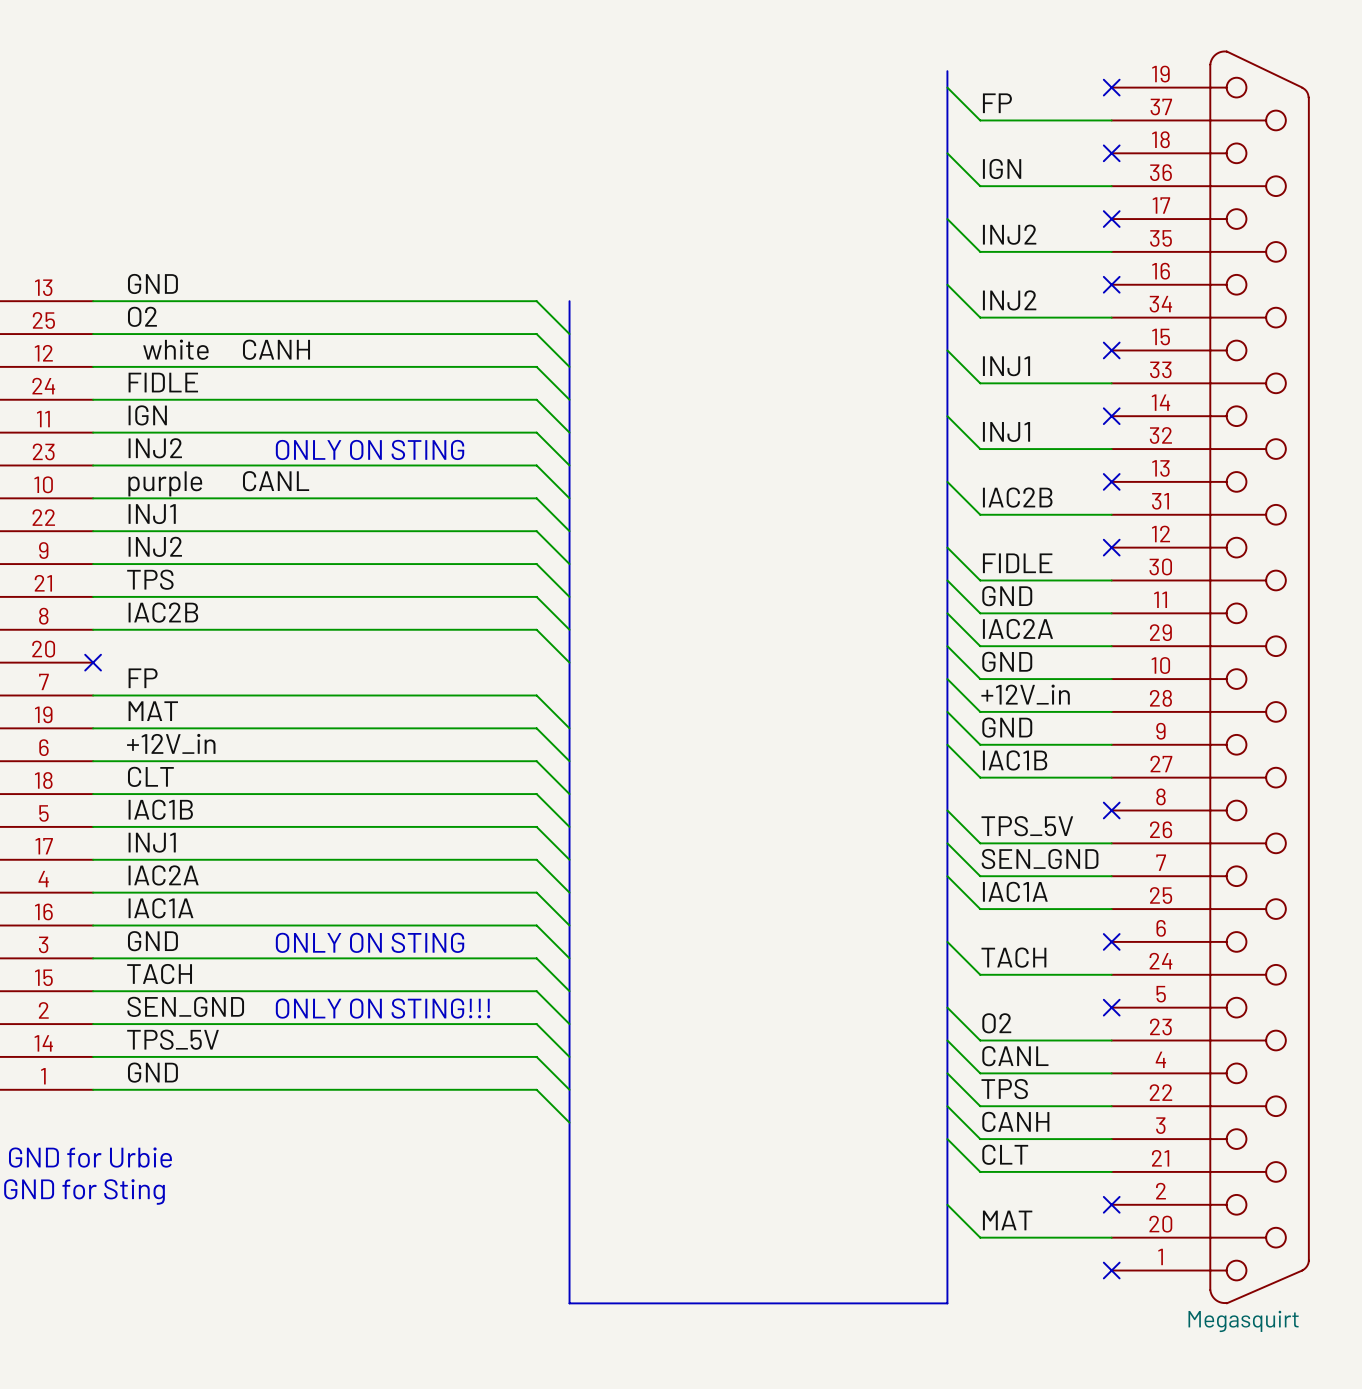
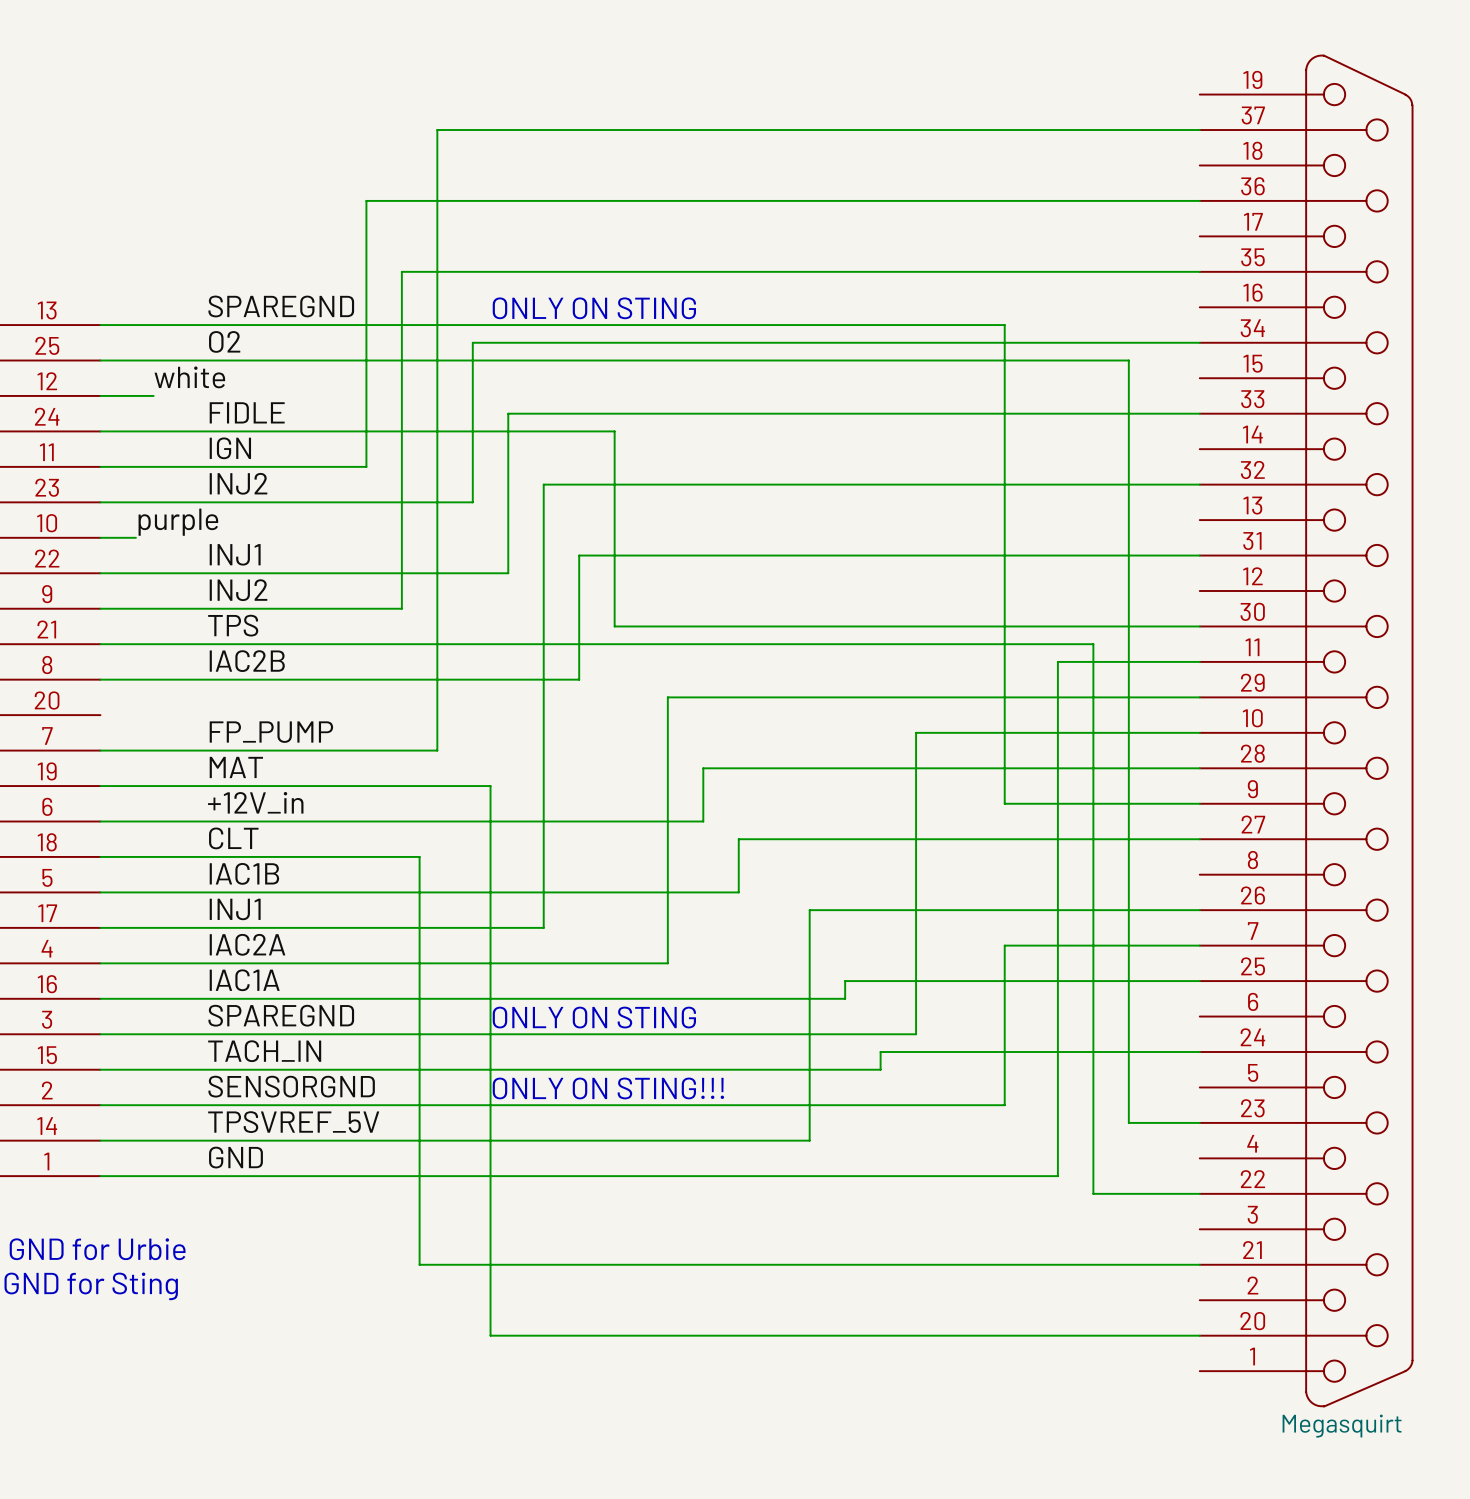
bus: (947, 71) (947, 1303) (569, 1303) (569, 301) -> none
wire: (947, 87) (980, 120) -> none
no-connect mark: (1111, 87) -> none
label: FP (997, 103) -> none
wire: (947, 153) (980, 186) -> none
no-connect mark: (1111, 153) -> none
label: IGN (1002, 168) -> none
wire: (947, 219) (980, 251) -> none
no-connect mark: (1111, 219) -> none
label: INJ2 (1009, 234) -> none
label: GND (152, 283) -> none
label: none -> SPAREGND (281, 306)
wire: (947, 284) (980, 317) -> none
no-connect mark: (1111, 284) -> none
label: INJ2 (1009, 300) -> none
wire: (536, 301) (569, 334) -> (579, 325) (1004, 325) (1004, 803) (1057, 803)
label position: O2 (142, 316) -> O2 (224, 341)
wire: (536, 334) (569, 366) -> none
label: CANH (276, 349) -> none
wire: (947, 350) (980, 383) -> none
no-connect mark: (1111, 350) -> none
wire: (142, 366) (536, 366) (569, 399) -> none
label: INJ1 (1006, 366) -> none
label position: FIDLE (163, 382) -> FIDLE (247, 412)
wire: (536, 399) (569, 432) -> (579, 431) (614, 431) (614, 626) (1057, 626)
label position: IGN (147, 415) -> IGN (230, 448)
wire: (947, 416) (980, 449) -> none
no-connect mark: (1111, 416) -> none
label: INJ1 (1006, 431) -> none
wire: (339, 432) (536, 432) (569, 465) -> (366, 466) (366, 200) (1057, 200)
label position: INJ2 (155, 448) -> INJ2 (238, 483)
text position: ONLY ON STING (370, 449) -> ONLY ON STING (594, 308)
wire: (438, 465) (536, 465) (569, 498) -> (472, 502) (472, 342) (1057, 342)
label: CANL (276, 481) -> none
wire: (947, 481) (980, 514) -> (579, 679) (579, 555) (1057, 555)
no-connect mark: (1111, 481) -> none
label: IAC2B (1017, 497) -> none
wire: (125, 498) (536, 498) (569, 531) -> none
label position: INJ1 (152, 514) -> INJ1 (235, 554)
wire: (470, 531) (536, 531) (569, 564) -> (508, 573) (508, 413) (1057, 413)
label position: INJ2 (155, 546) -> INJ2 (238, 590)
wire: (947, 547) (980, 580) -> none
no-connect mark: (1111, 547) -> none
label: FIDLE (1017, 563) -> none
wire: (372, 564) (536, 564) (569, 596) -> (401, 608) (401, 271) (1057, 271)
label position: TPS (150, 579) -> TPS (233, 625)
wire: (947, 580) (980, 613) -> (579, 1176) (1057, 1176) (1057, 661)
wire: (536, 596) (569, 629) -> none
label: GND (1007, 596) -> none
label position: IAC2B (163, 612) -> IAC2B (247, 661)
wire: (947, 613) (980, 646) -> (579, 963) (667, 963) (667, 697) (1057, 697)
wire: (536, 629) (569, 662) -> none
label: IAC2A (1017, 629) -> none
wire: (947, 646) (980, 679) -> none
label: GND (1007, 661) -> none
no-connect mark: (93, 662) -> none
label: FP (143, 678) -> none
label: none -> FP_PUMP (271, 732)
wire: (947, 679) (980, 711) -> (579, 821) (703, 821) (703, 768) (1057, 768)
label: +12V_in (1025, 694) -> none
wire: (405, 695) (536, 695) (569, 728) -> (437, 750) (437, 130) (1057, 130)
label position: MAT (153, 711) -> MAT (236, 767)
wire: (947, 711) (980, 744) -> none
label: GND (1007, 727) -> none
wire: (454, 728) (536, 728) (569, 761) -> (490, 786) (490, 1335) (1057, 1335)
label position: +12V_in (171, 743) -> +12V_in (255, 802)
wire: (947, 744) (980, 777) -> (579, 892) (738, 892) (738, 839) (1057, 839)
label: IAC1B (1015, 760) -> none
wire: (536, 761) (569, 794) -> none
label position: CLT (150, 776) -> CLT (233, 838)
wire: (388, 794) (536, 794) (569, 826) -> (419, 856) (419, 1264) (1057, 1264)
label position: IAC1B (160, 809) -> IAC1B (244, 873)
wire: (947, 810) (980, 843) -> (579, 1140) (809, 1140) (809, 910) (1057, 910)
no-connect mark: (1111, 810) -> none
wire: (536, 826) (569, 859) -> none
label: TPS_5V (1027, 826) -> none
label position: INJ1 (152, 842) -> INJ1 (235, 909)
wire: (947, 843) (980, 876) -> (579, 1105) (1004, 1105) (1004, 945) (1057, 945)
wire: (503, 859) (536, 859) (569, 892) -> (543, 927) (543, 484) (1057, 484)
label: SEN_GND (1040, 859) -> none
label position: IAC2A (163, 875) -> IAC2A (247, 944)
wire: (947, 876) (980, 909) -> (579, 998) (845, 998) (845, 981) (1057, 981)
label: IAC1A (1015, 891) -> none
wire: (536, 892) (569, 925) -> none
label position: IAC1A (160, 908) -> IAC1A (244, 980)
wire: (536, 925) (569, 958) -> none
label: GND (152, 941) -> none
label: none -> SPAREGND (281, 1015)
wire: (947, 941) (980, 974) -> (579, 1069) (880, 1069) (880, 1052) (1057, 1052)
no-connect mark: (1111, 941) -> none
text position: ONLY ON STING (370, 942) -> ONLY ON STING (594, 1017)
label: TACH (1013, 957) -> none
wire: (536, 958) (569, 991) -> (579, 1034) (916, 1034) (916, 732) (1057, 732)
label: TACH (159, 974) -> TACH_IN (264, 1051)
wire: (536, 991) (569, 1024) -> none
label: SEN_GND (185, 1006) -> SENSORGND (291, 1086)
wire: (947, 1007) (980, 1040) (1045, 1040) -> (579, 360) (1128, 360) (1128, 1122)
no-connect mark: (1111, 1007) -> none
text position: ONLY ON STING!!! (383, 1008) -> ONLY ON STING!!! (608, 1088)
label: O2 (996, 1023) -> none
wire: (536, 1024) (569, 1056) -> none
label: TPS_5V (173, 1039) -> TPSVREF_5V (293, 1122)
wire: (947, 1040) (980, 1073) (1111, 1073) -> none
wire: (536, 1056) (569, 1089) -> none
label: CANL (1015, 1056) -> none
label position: GND (152, 1072) -> GND (235, 1157)
wire: (947, 1073) (980, 1106) (1013, 1106) -> (579, 644) (1093, 644) (1093, 1193)
wire: (536, 1089) (569, 1122) -> none
label: TPS (1004, 1089) -> none
wire: (947, 1106) (980, 1139) (1111, 1139) -> none
label: CANH (1015, 1121) -> none
wire: (947, 1139) (980, 1171) -> none
label: CLT (1005, 1154) -> none
wire: (947, 1204) (980, 1237) -> none
no-connect mark: (1111, 1204) -> none
label: MAT (1007, 1220) -> none
no-connect mark: (1111, 1270) -> none

